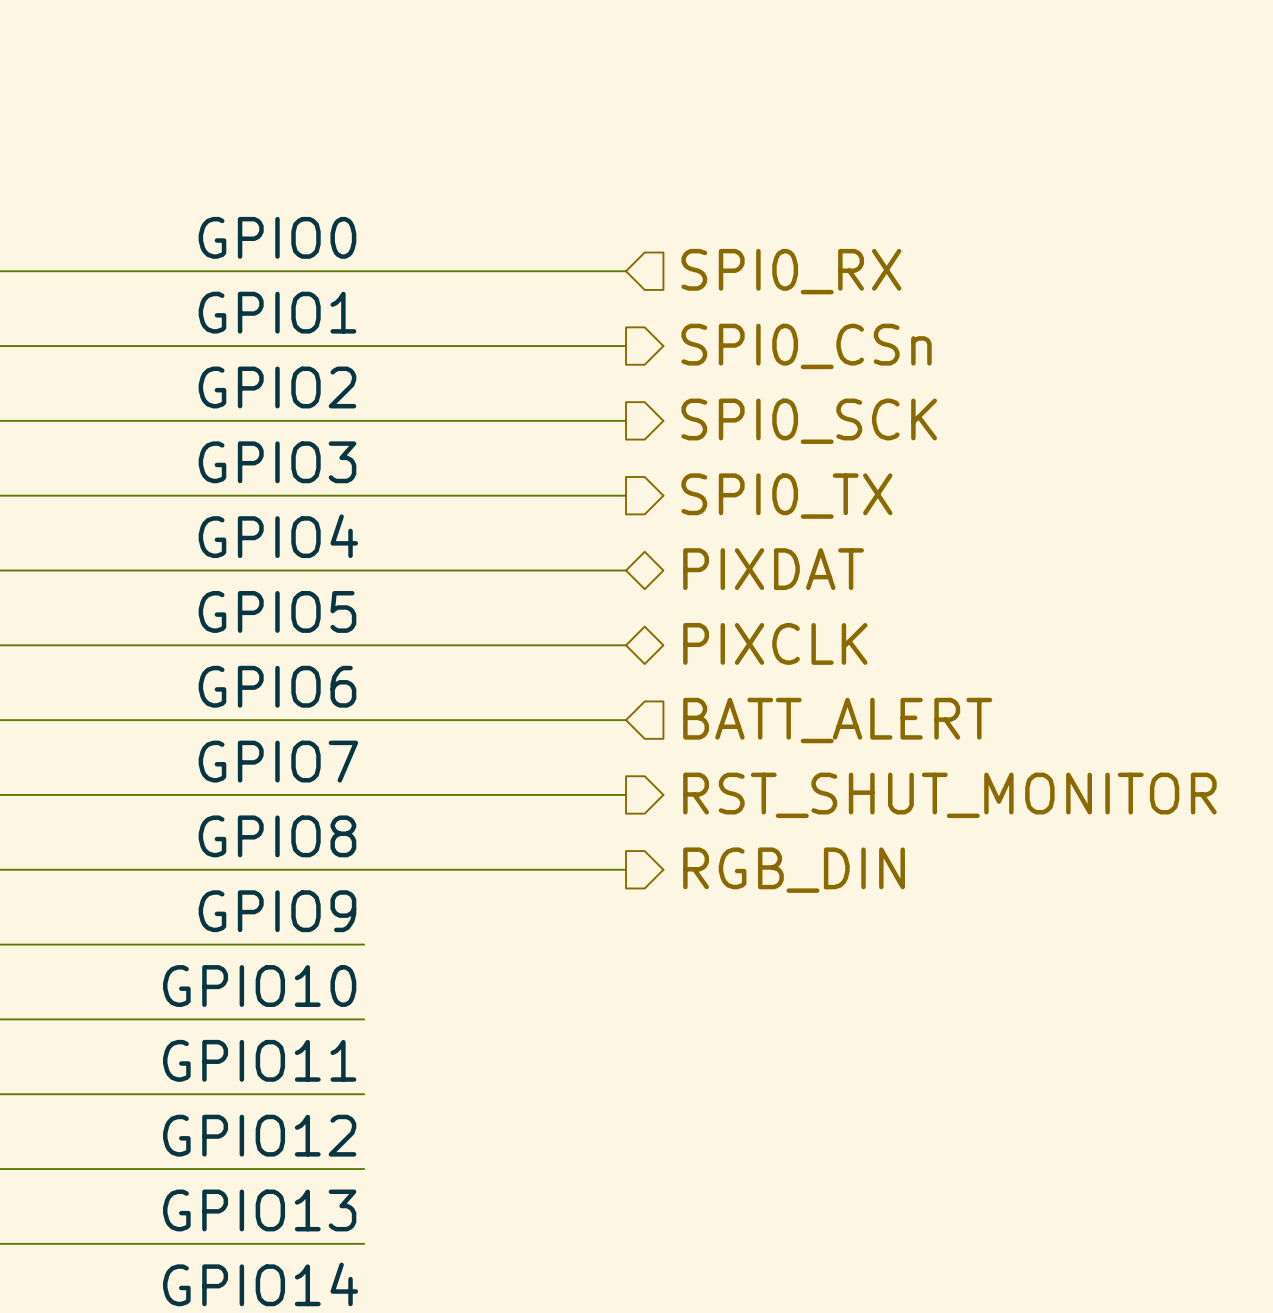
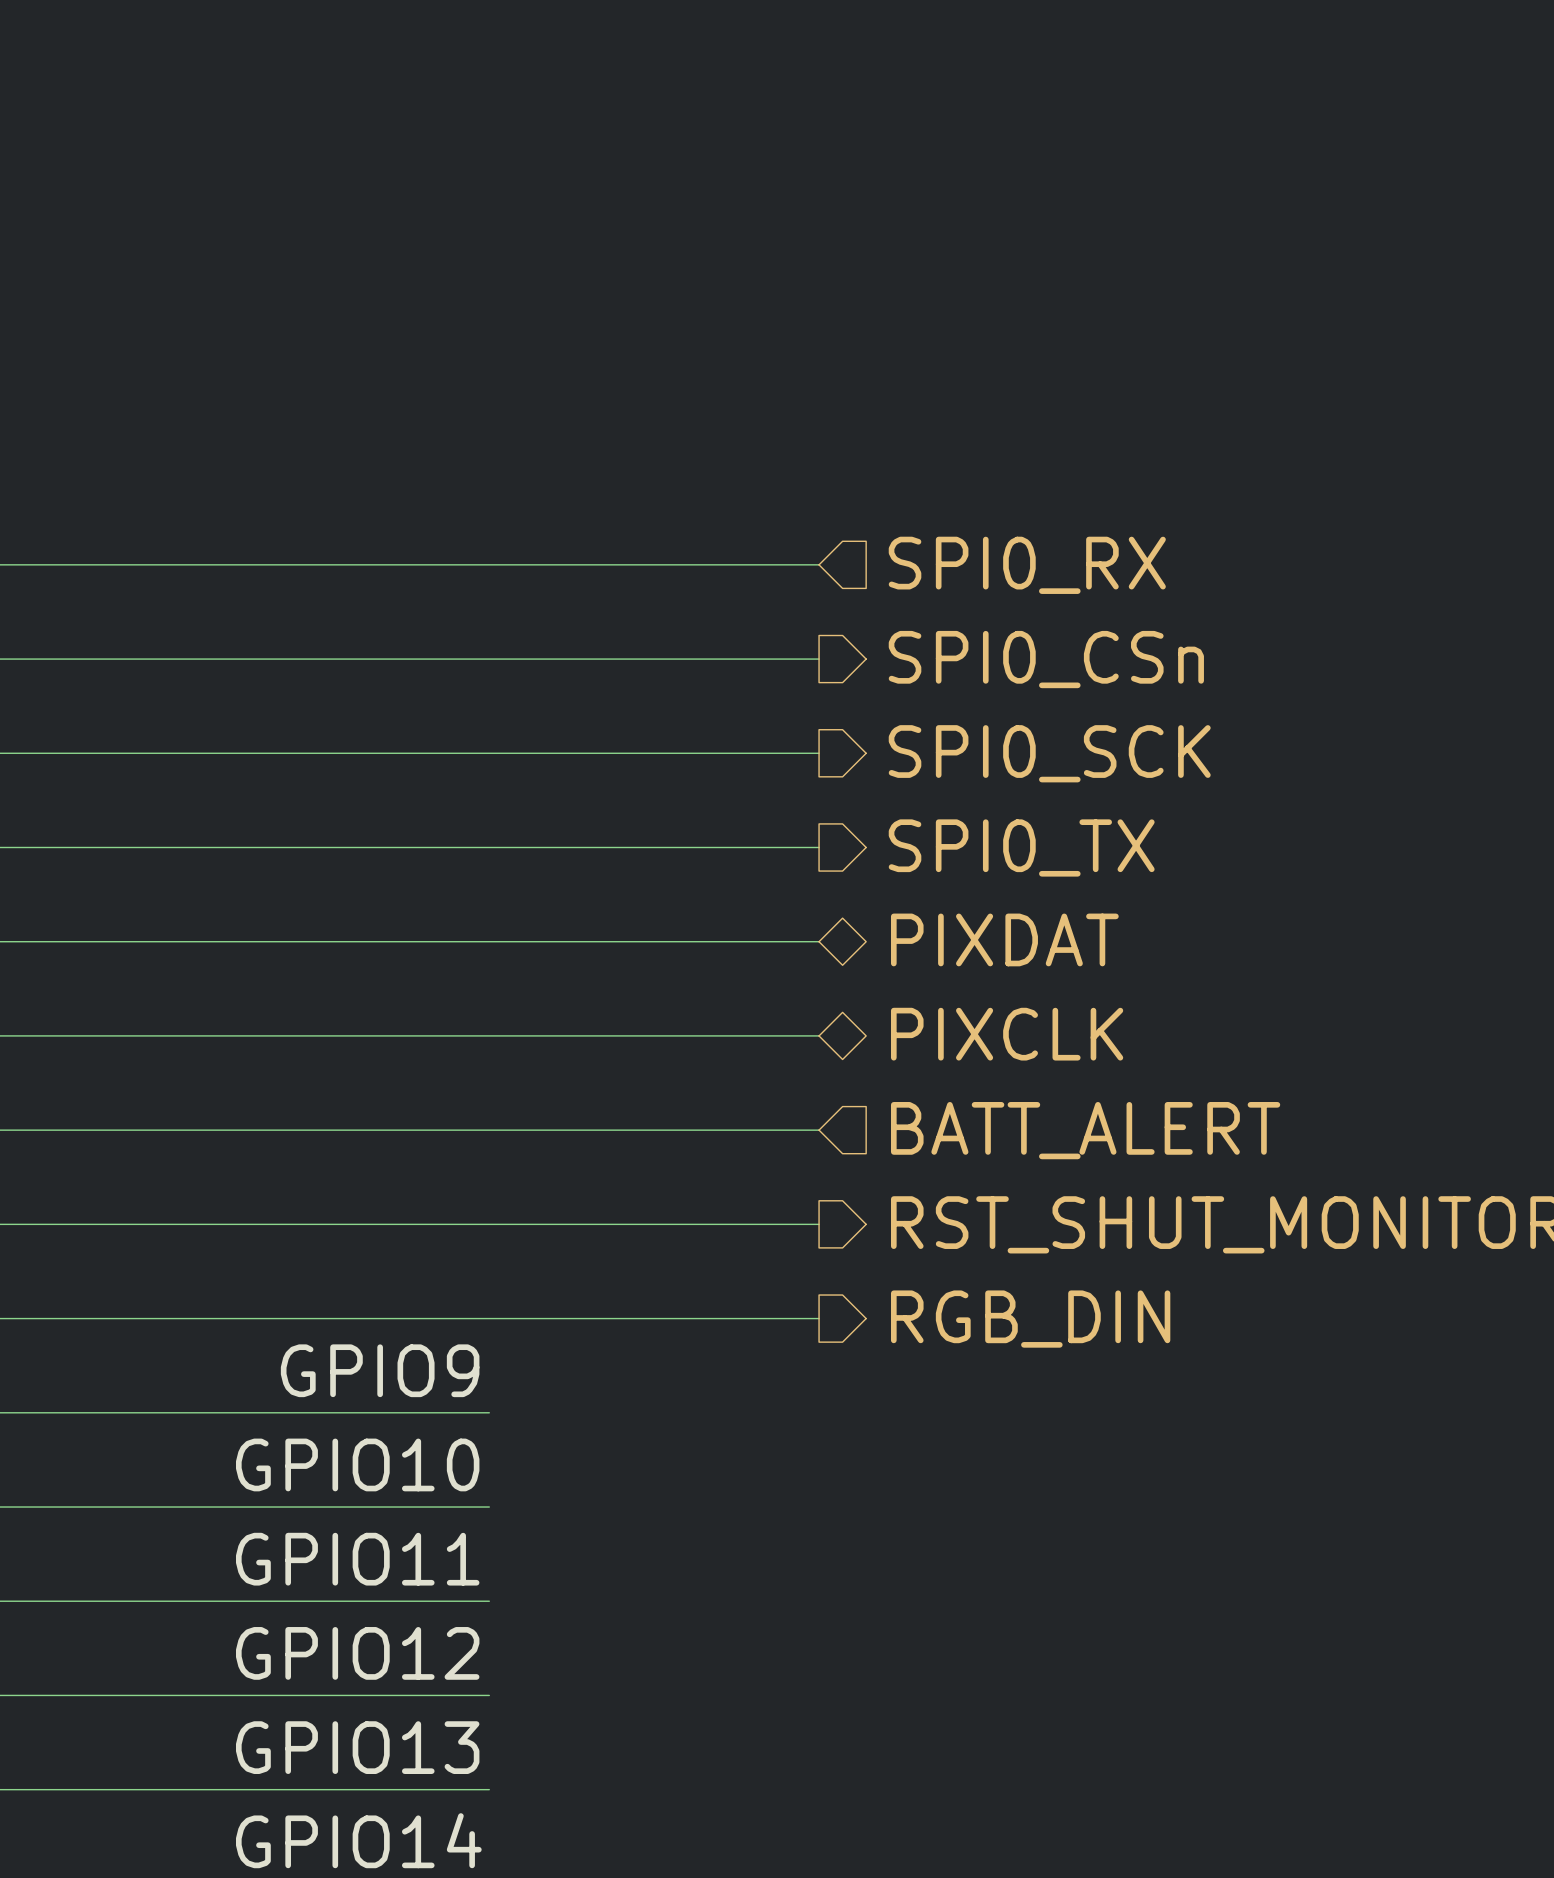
label: GPIO0 (277, 237) -> none
label: GPIO1 (277, 312) -> none
label: GPIO2 (277, 387) -> none
label: GPIO3 (277, 462) -> none
label: GPIO4 (278, 536) -> none
label: GPIO5 (277, 611) -> none
label: GPIO6 (277, 686) -> none
label: GPIO7 (278, 761) -> none
label: GPIO8 (277, 836) -> none

